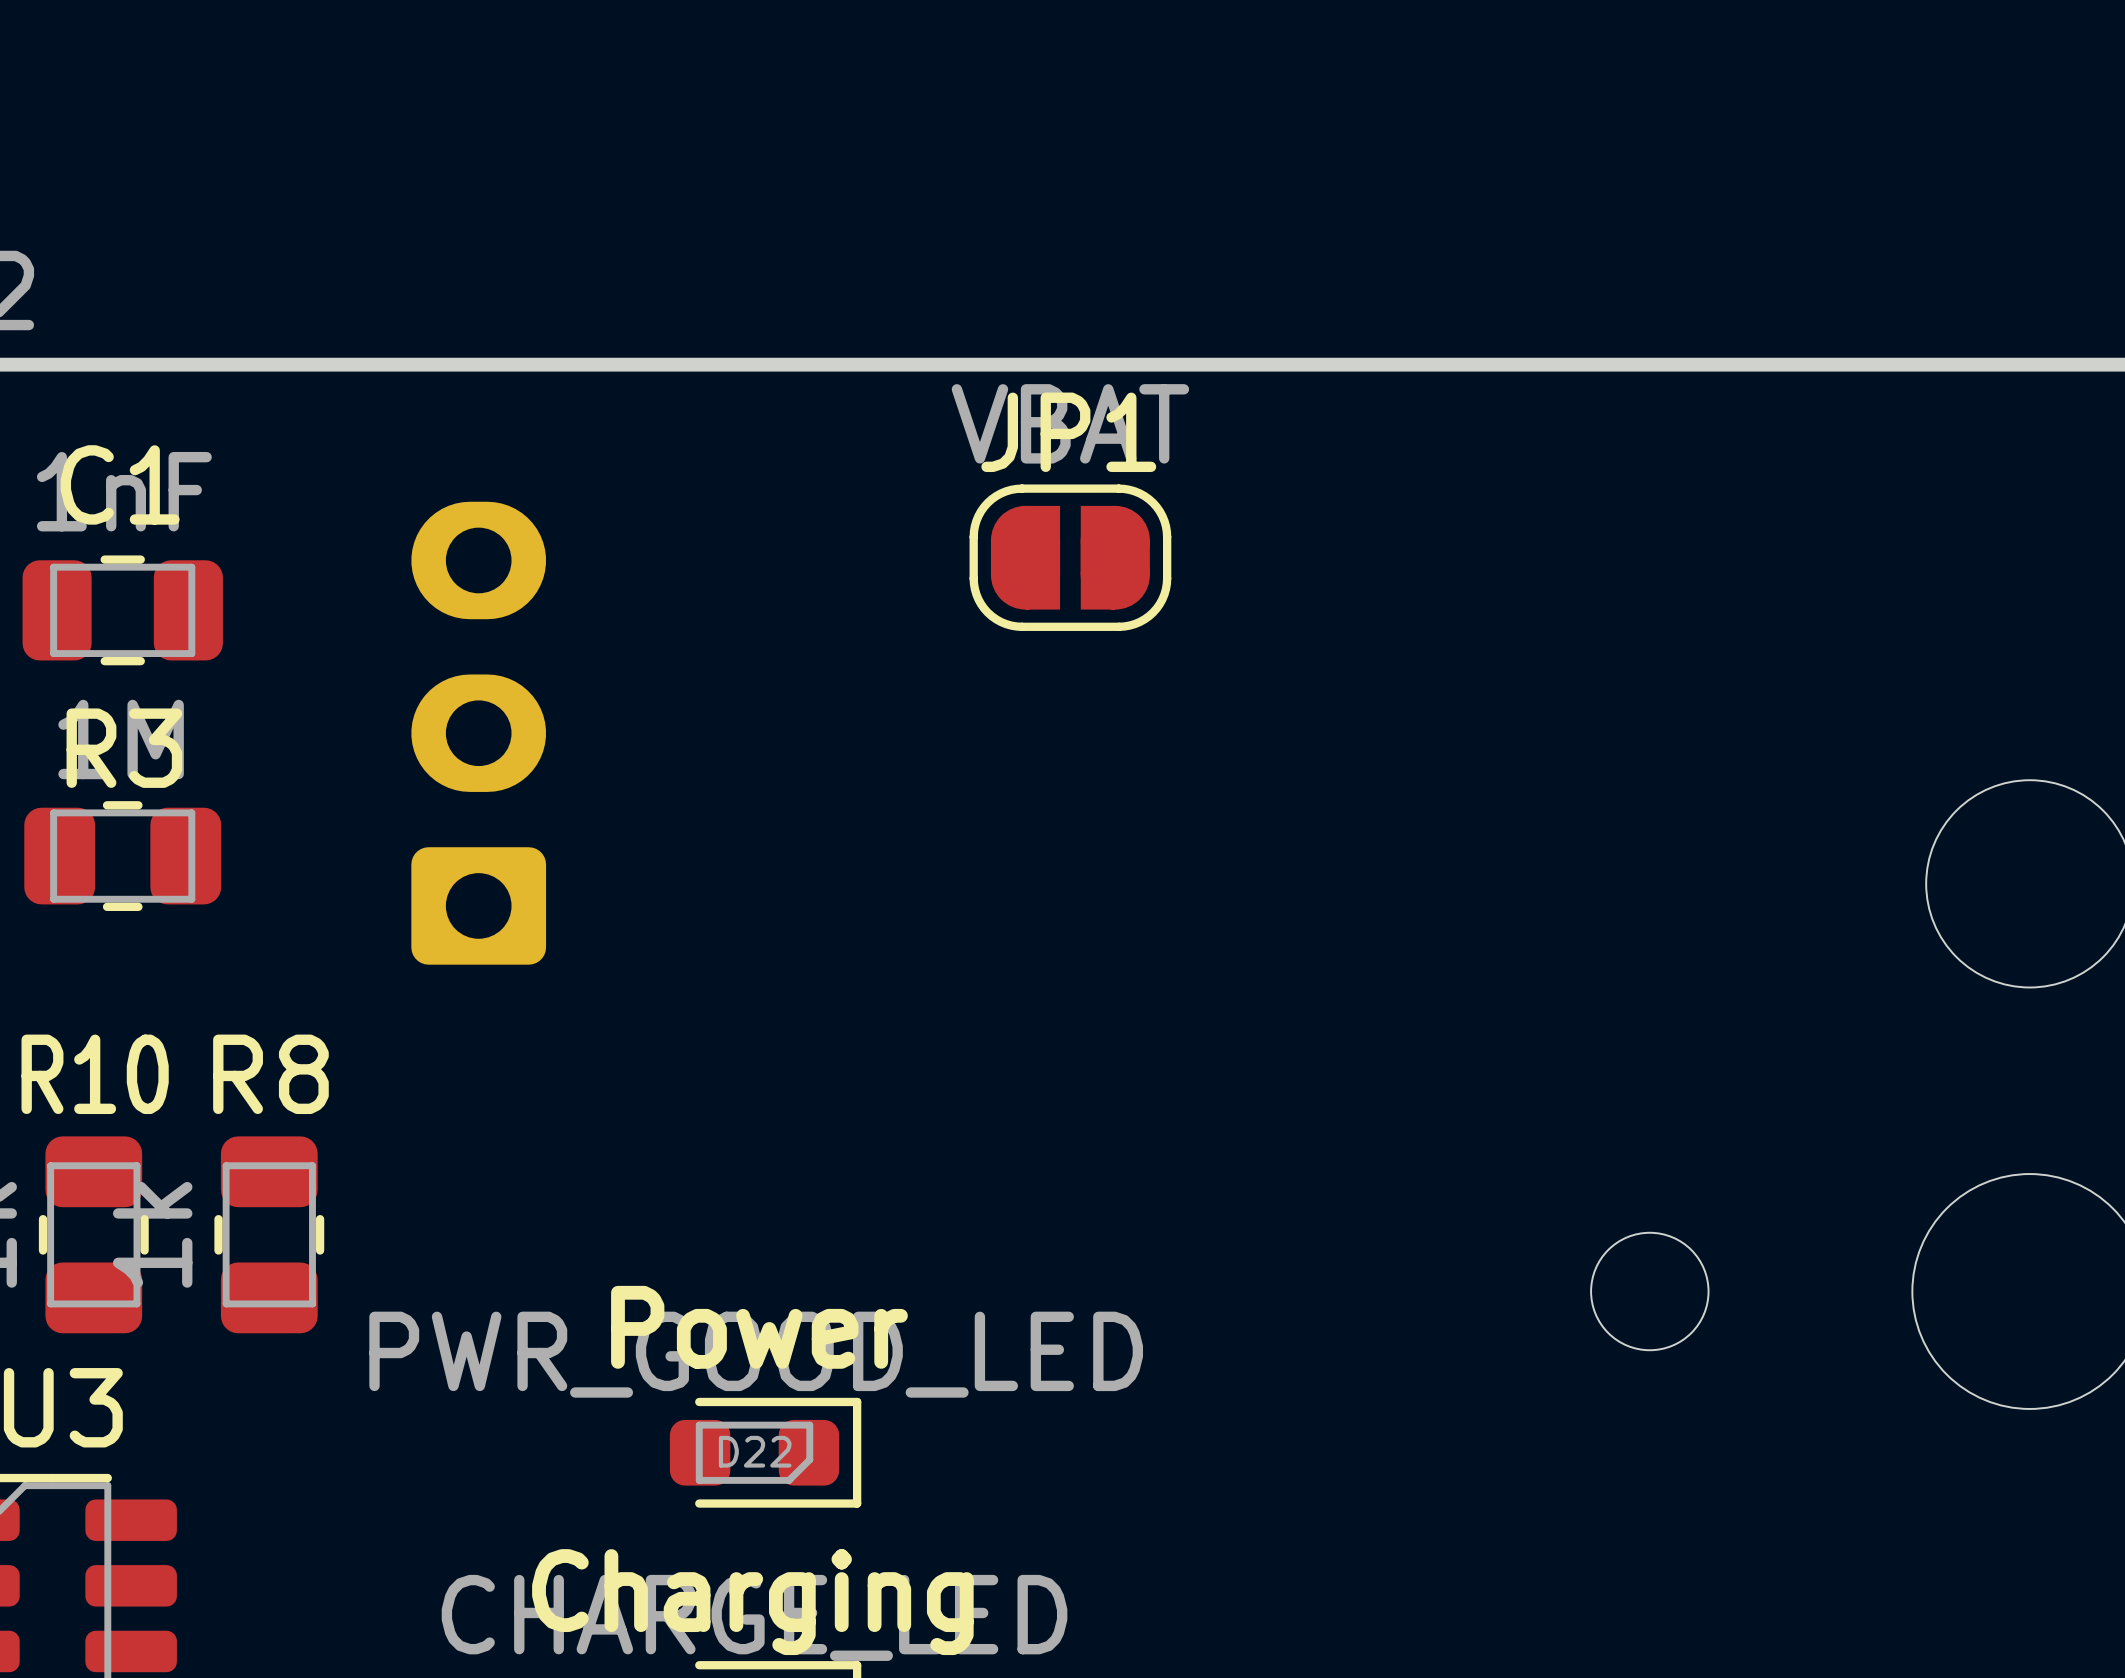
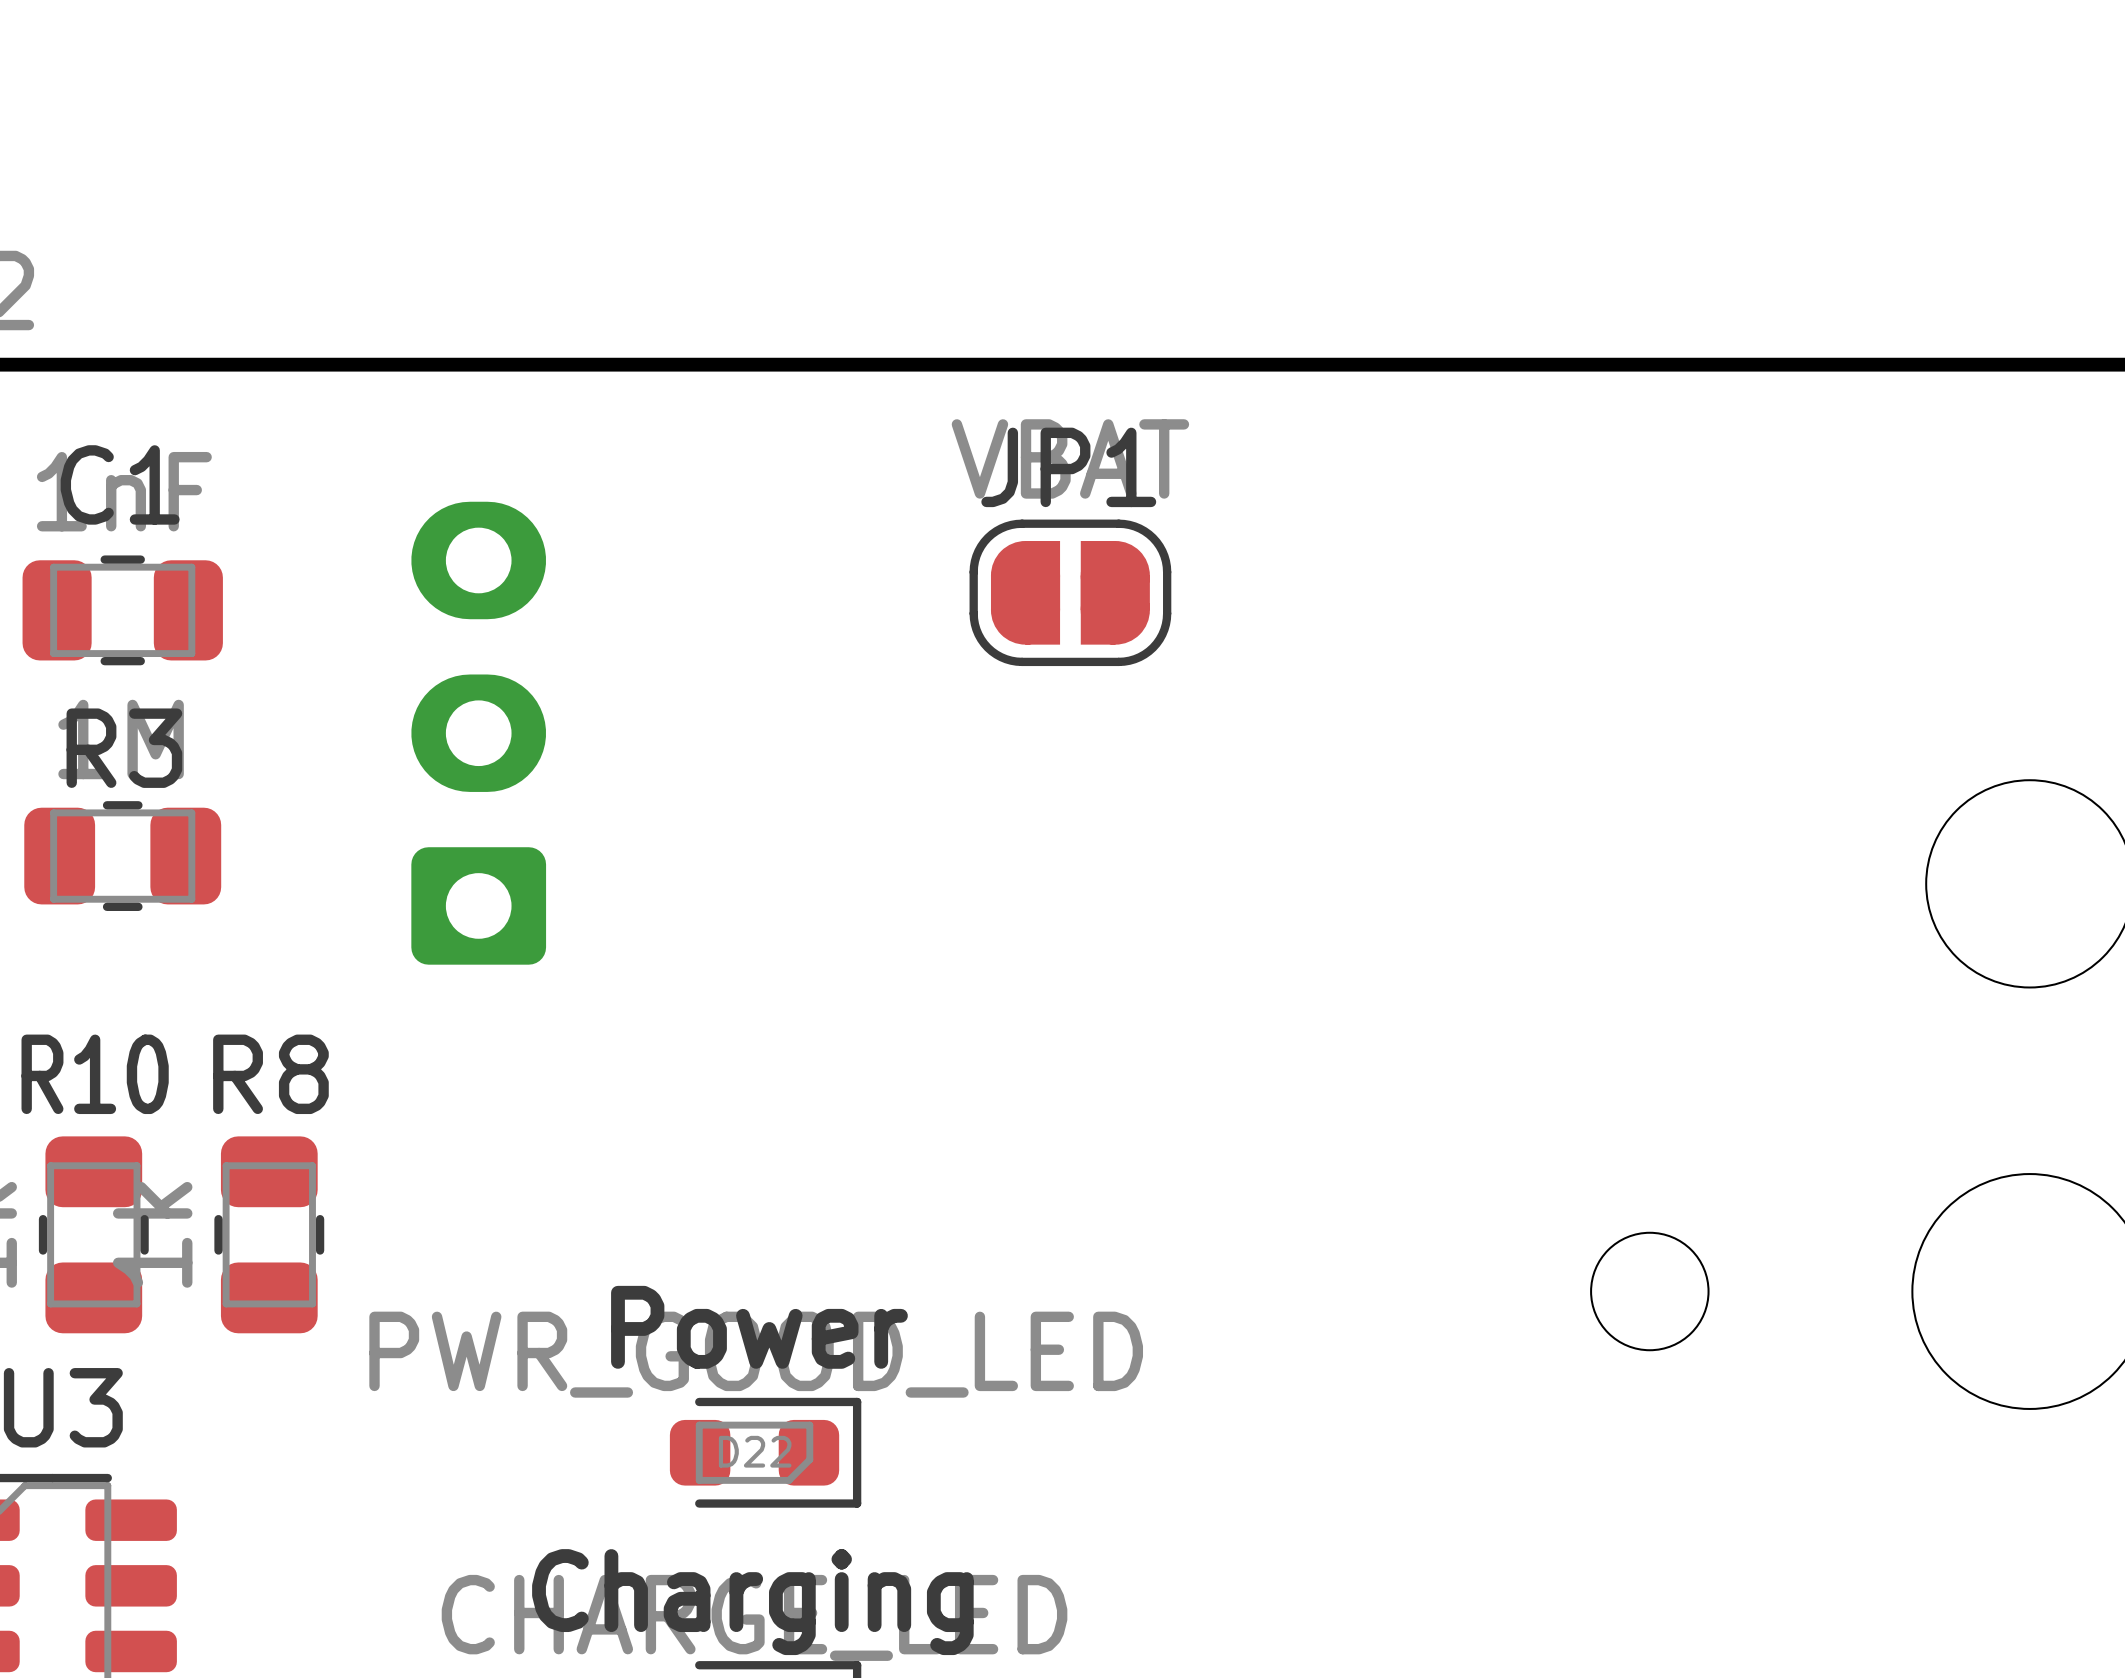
JP1 position: (1070, 557) -> (1070, 592)

